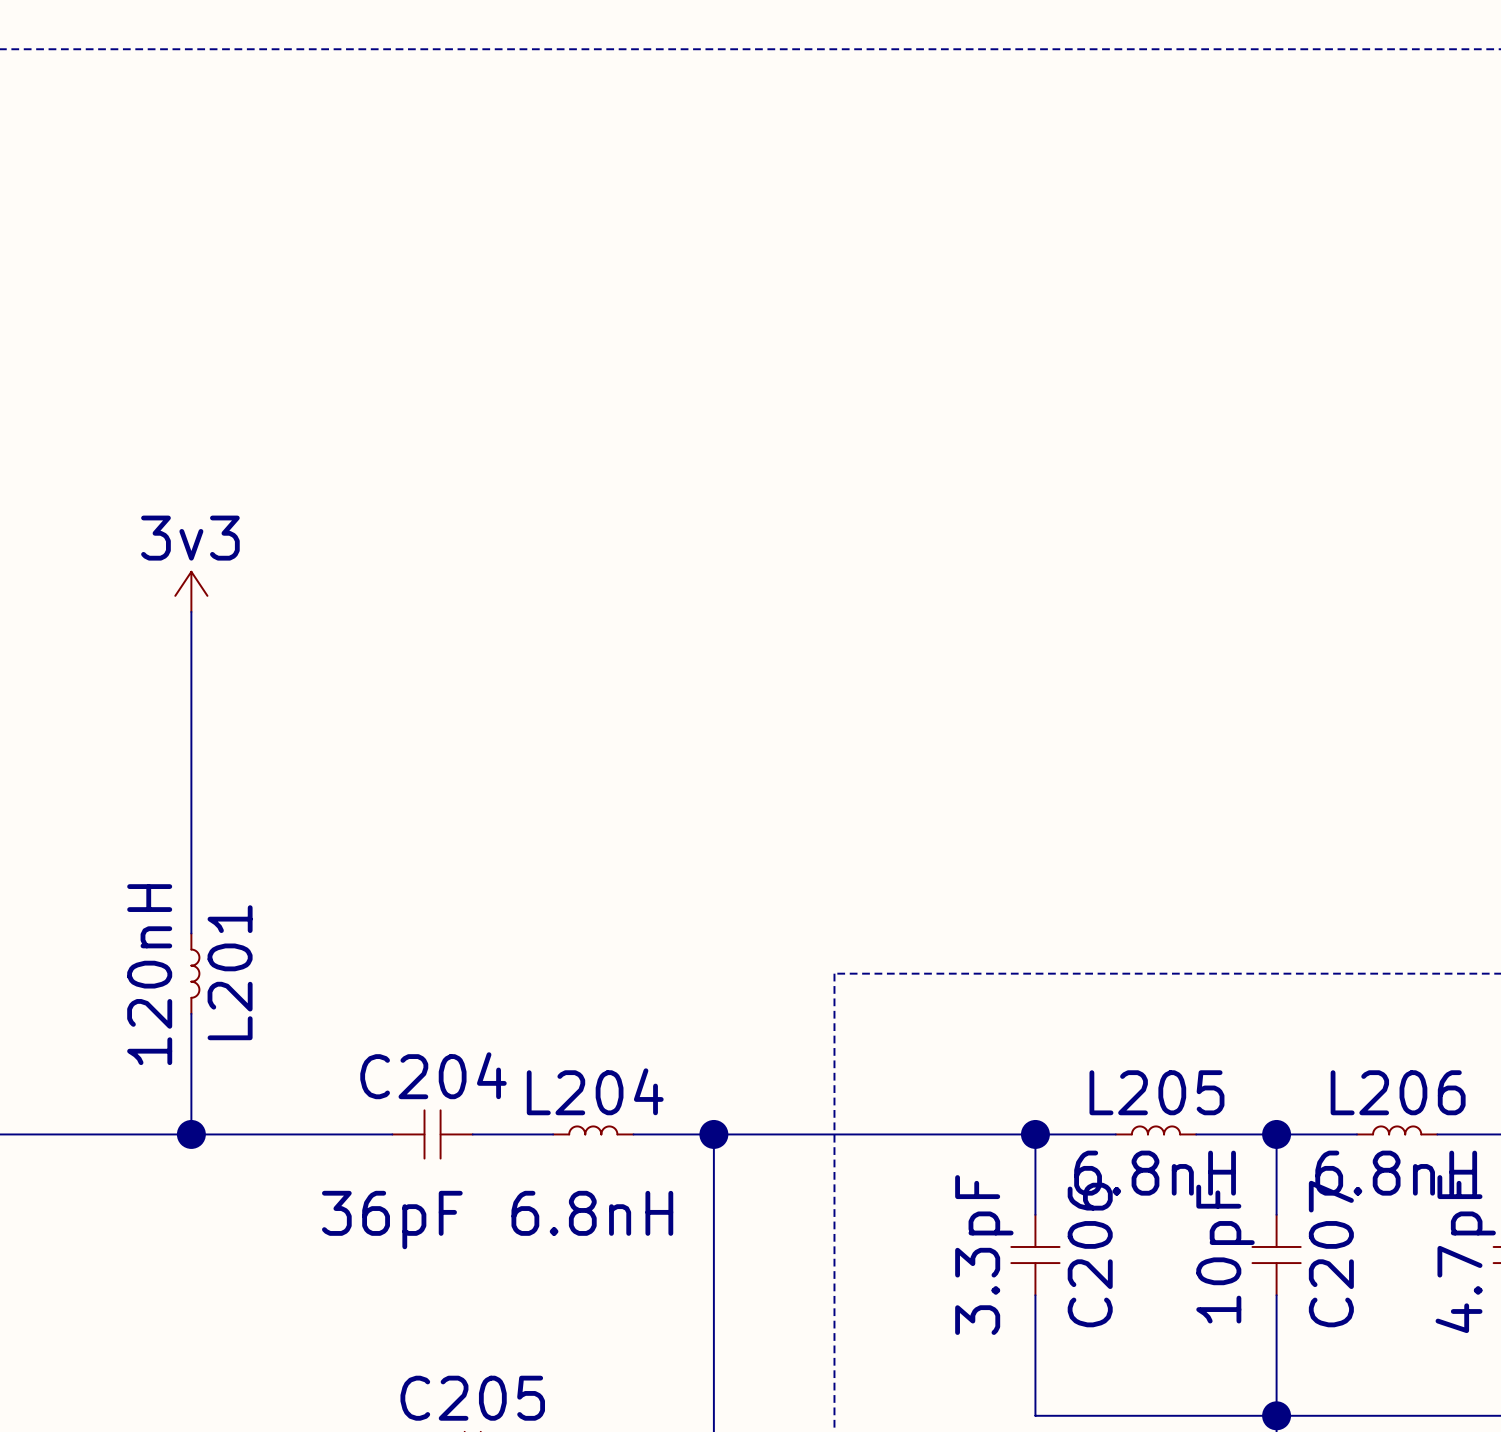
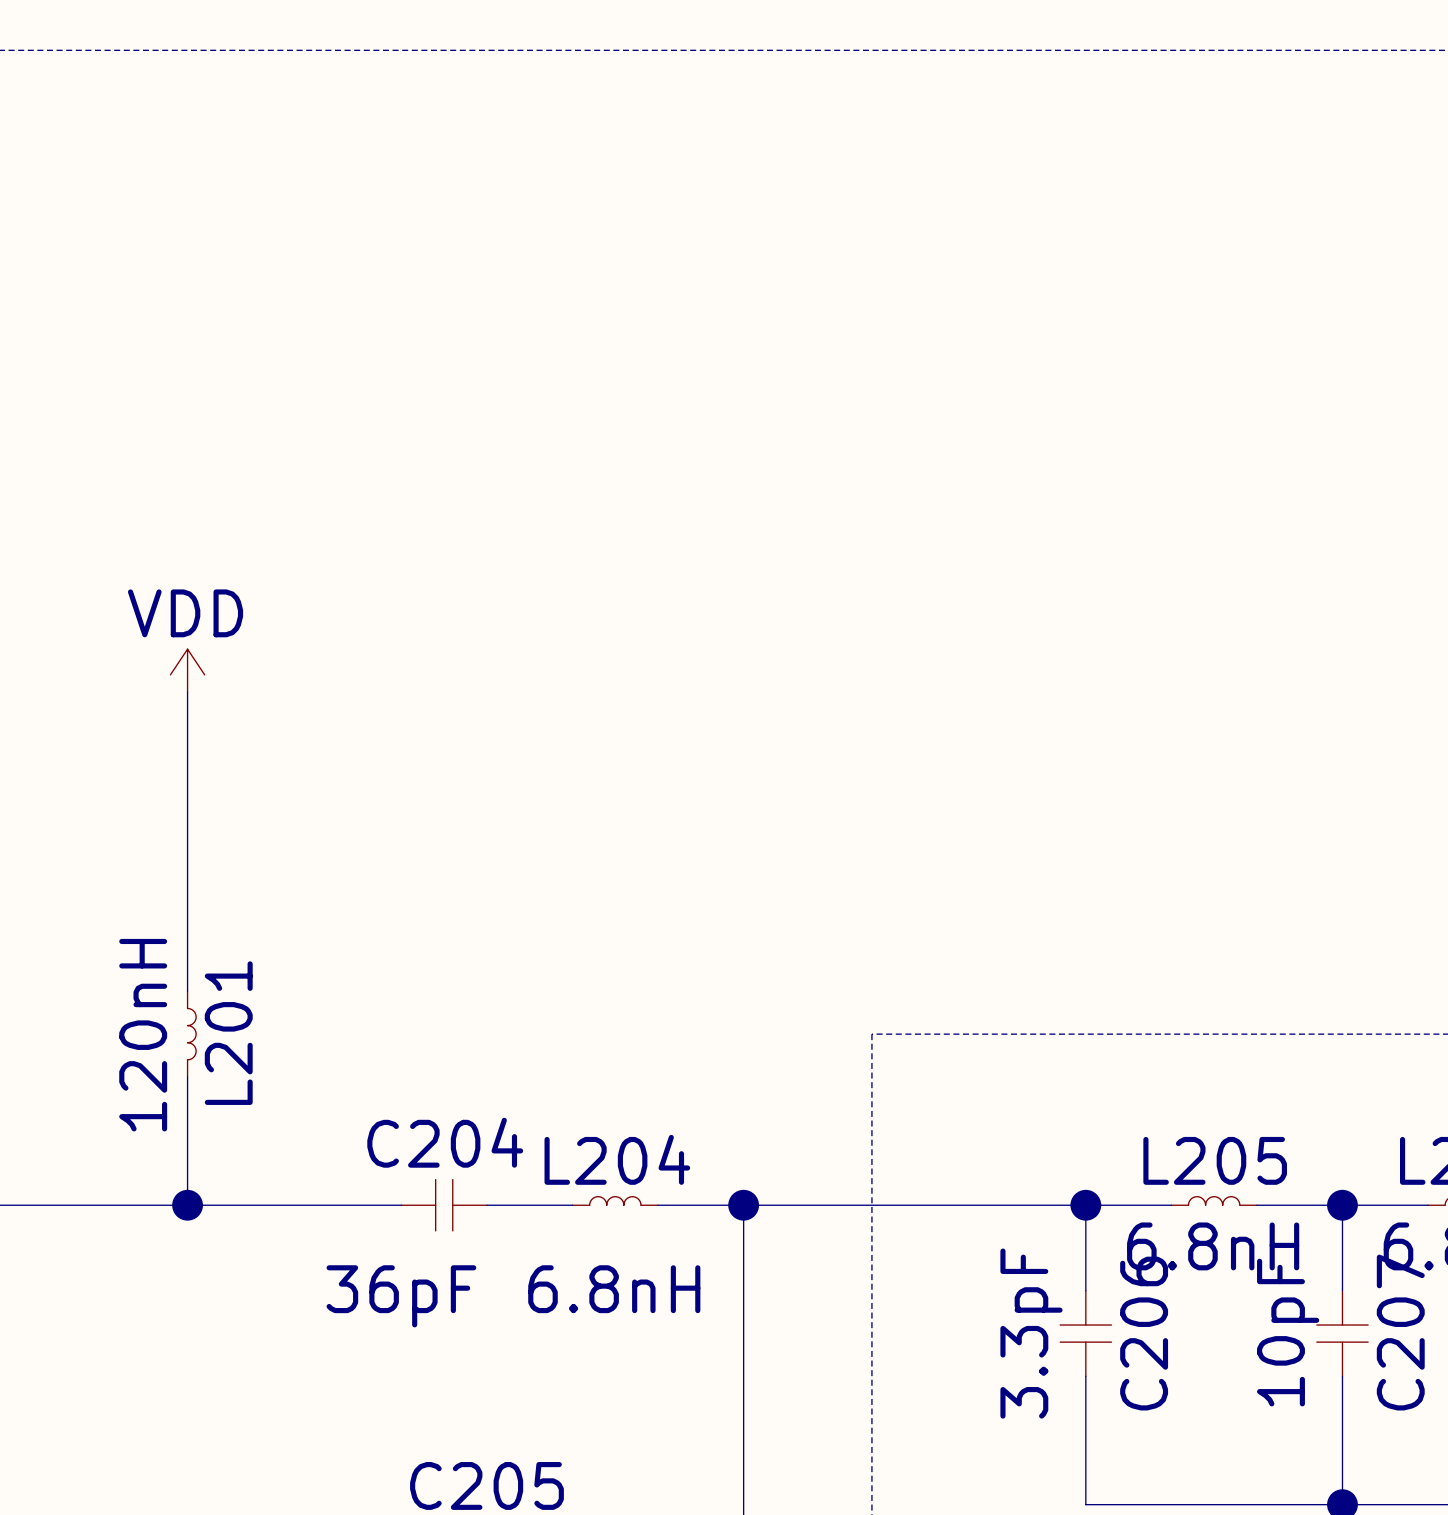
power symbol: 3v3 (191, 591) -> none
power symbol: none -> VDD (187, 670)

